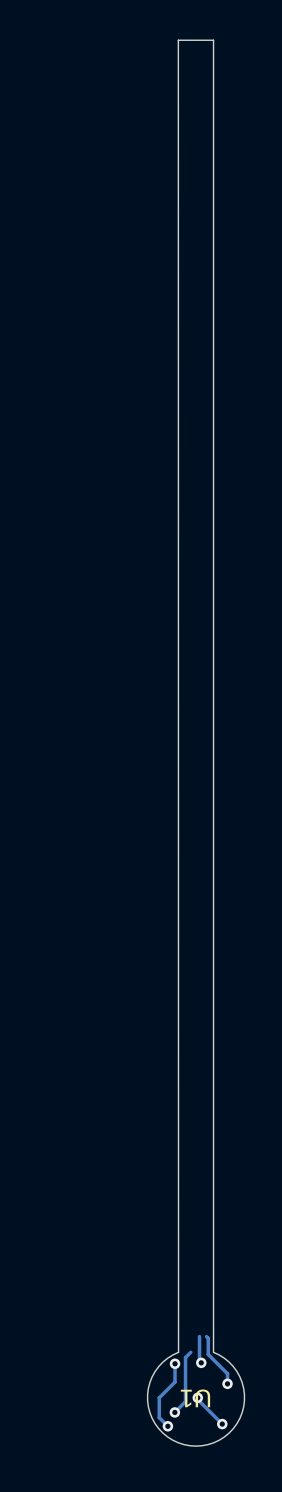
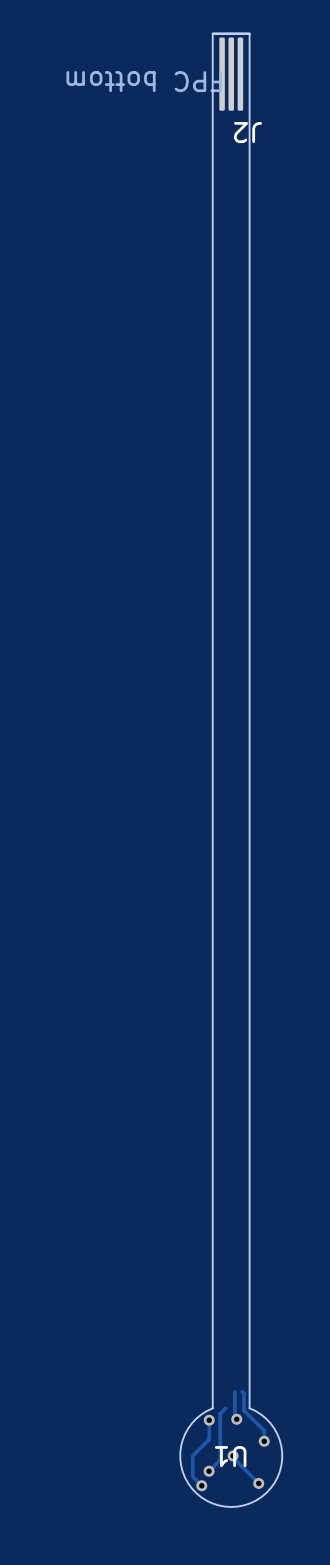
board edge: (213, 40) (178, 40) (178, 1352) (163, 1362) (155, 1371) (148, 1388) (147, 1400) (149, 1412) (158, 1428) (167, 1436) (178, 1442) (196, 1446) (208, 1444) (219, 1440) (233, 1428) (242, 1412) (244, 1394) (239, 1376) (228, 1362) (213, 1352) -> (212, 33) (212, 1408) (196, 1418) (188, 1428) (181, 1446) (180, 1459) (185, 1477) (191, 1488) (201, 1497) (212, 1503) (231, 1506) (250, 1503) (266, 1493) (277, 1477) (282, 1458) (279, 1439) (270, 1423) (260, 1414) (249, 1408)
J2: none -> FPC bottom (231, 71)

